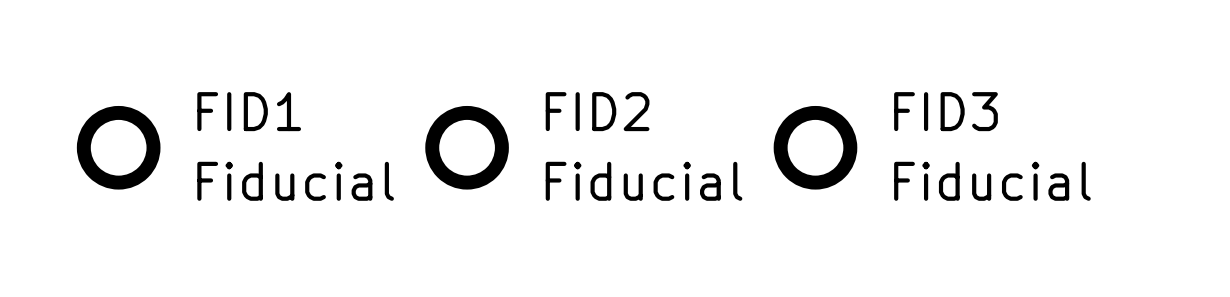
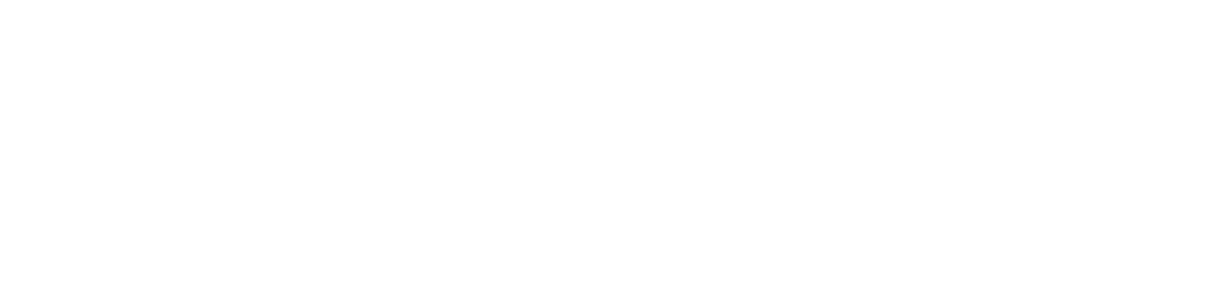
FID1: Fiducial (118, 147) -> none
FID2: Fiducial (467, 147) -> none
FID3: Fiducial (815, 147) -> none

